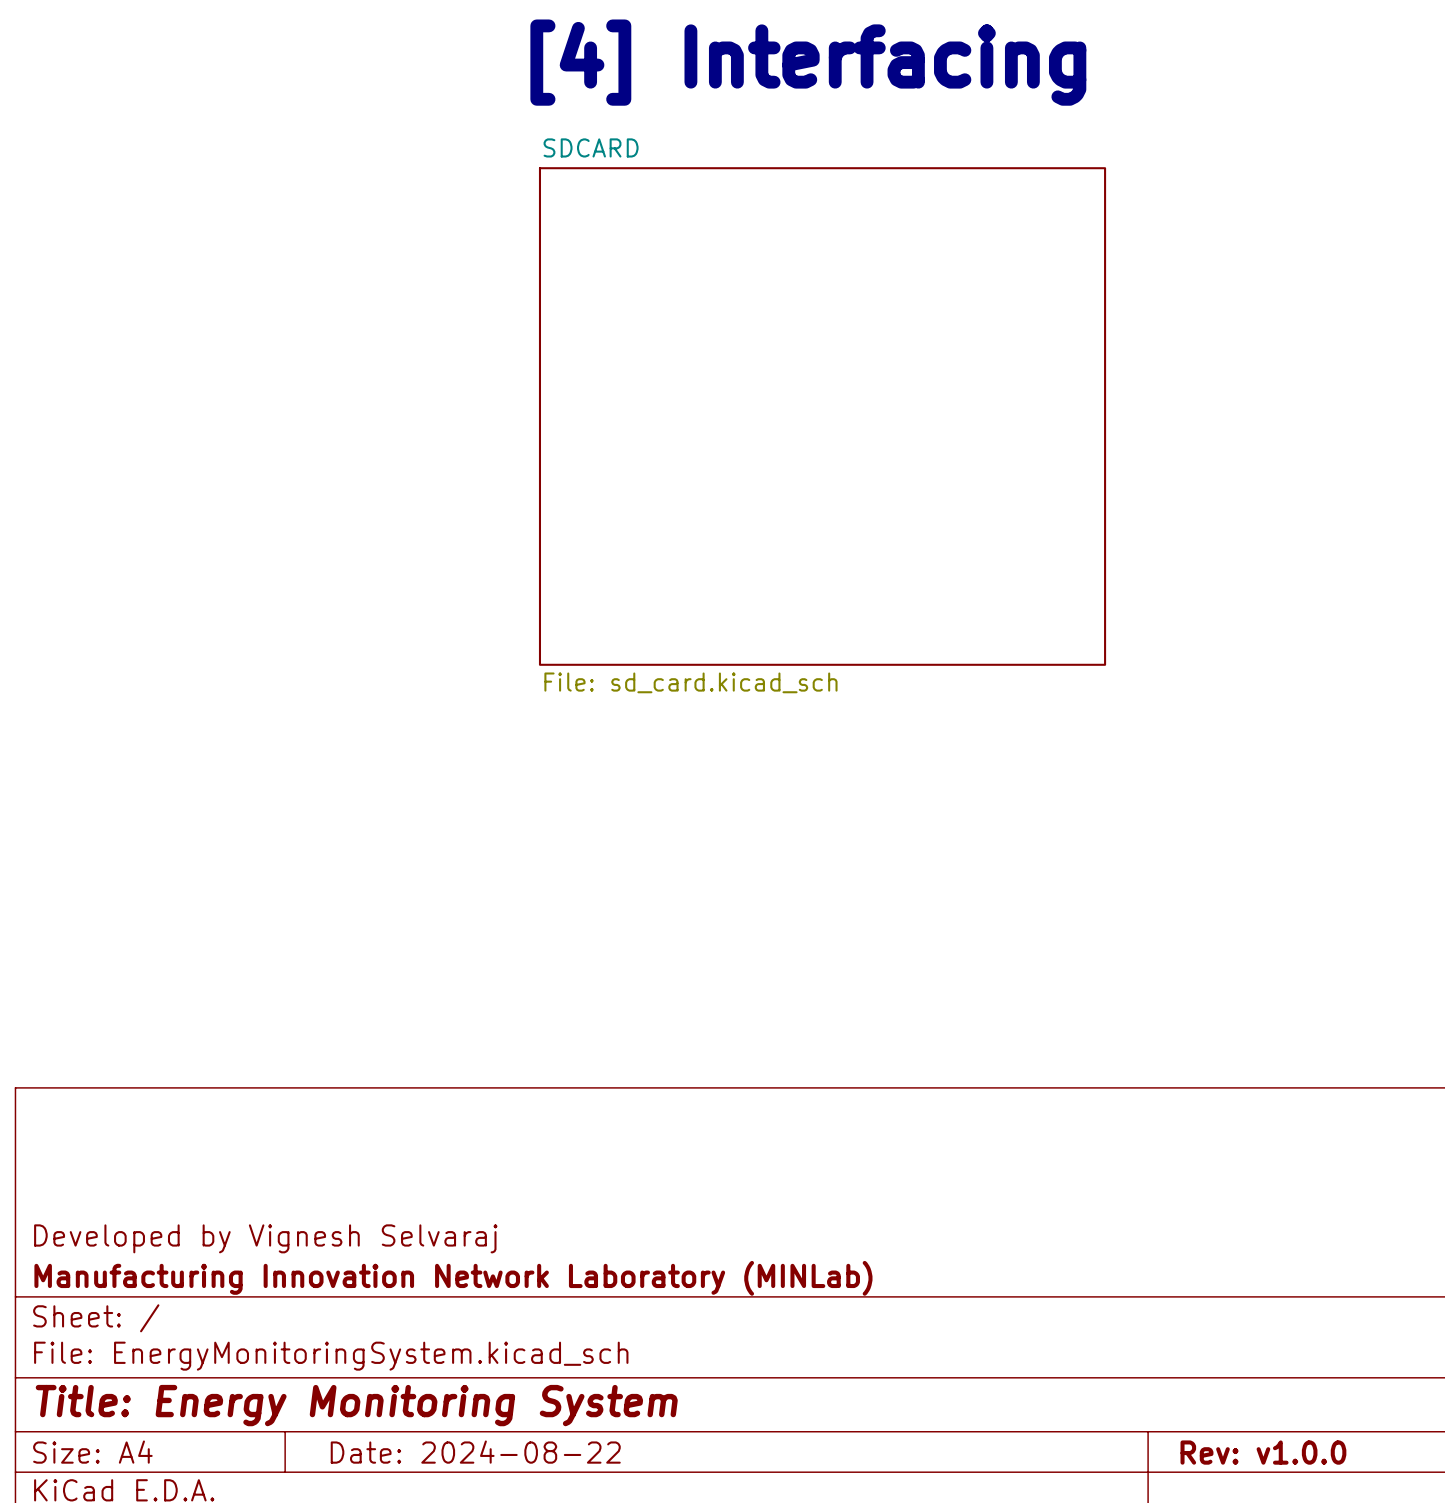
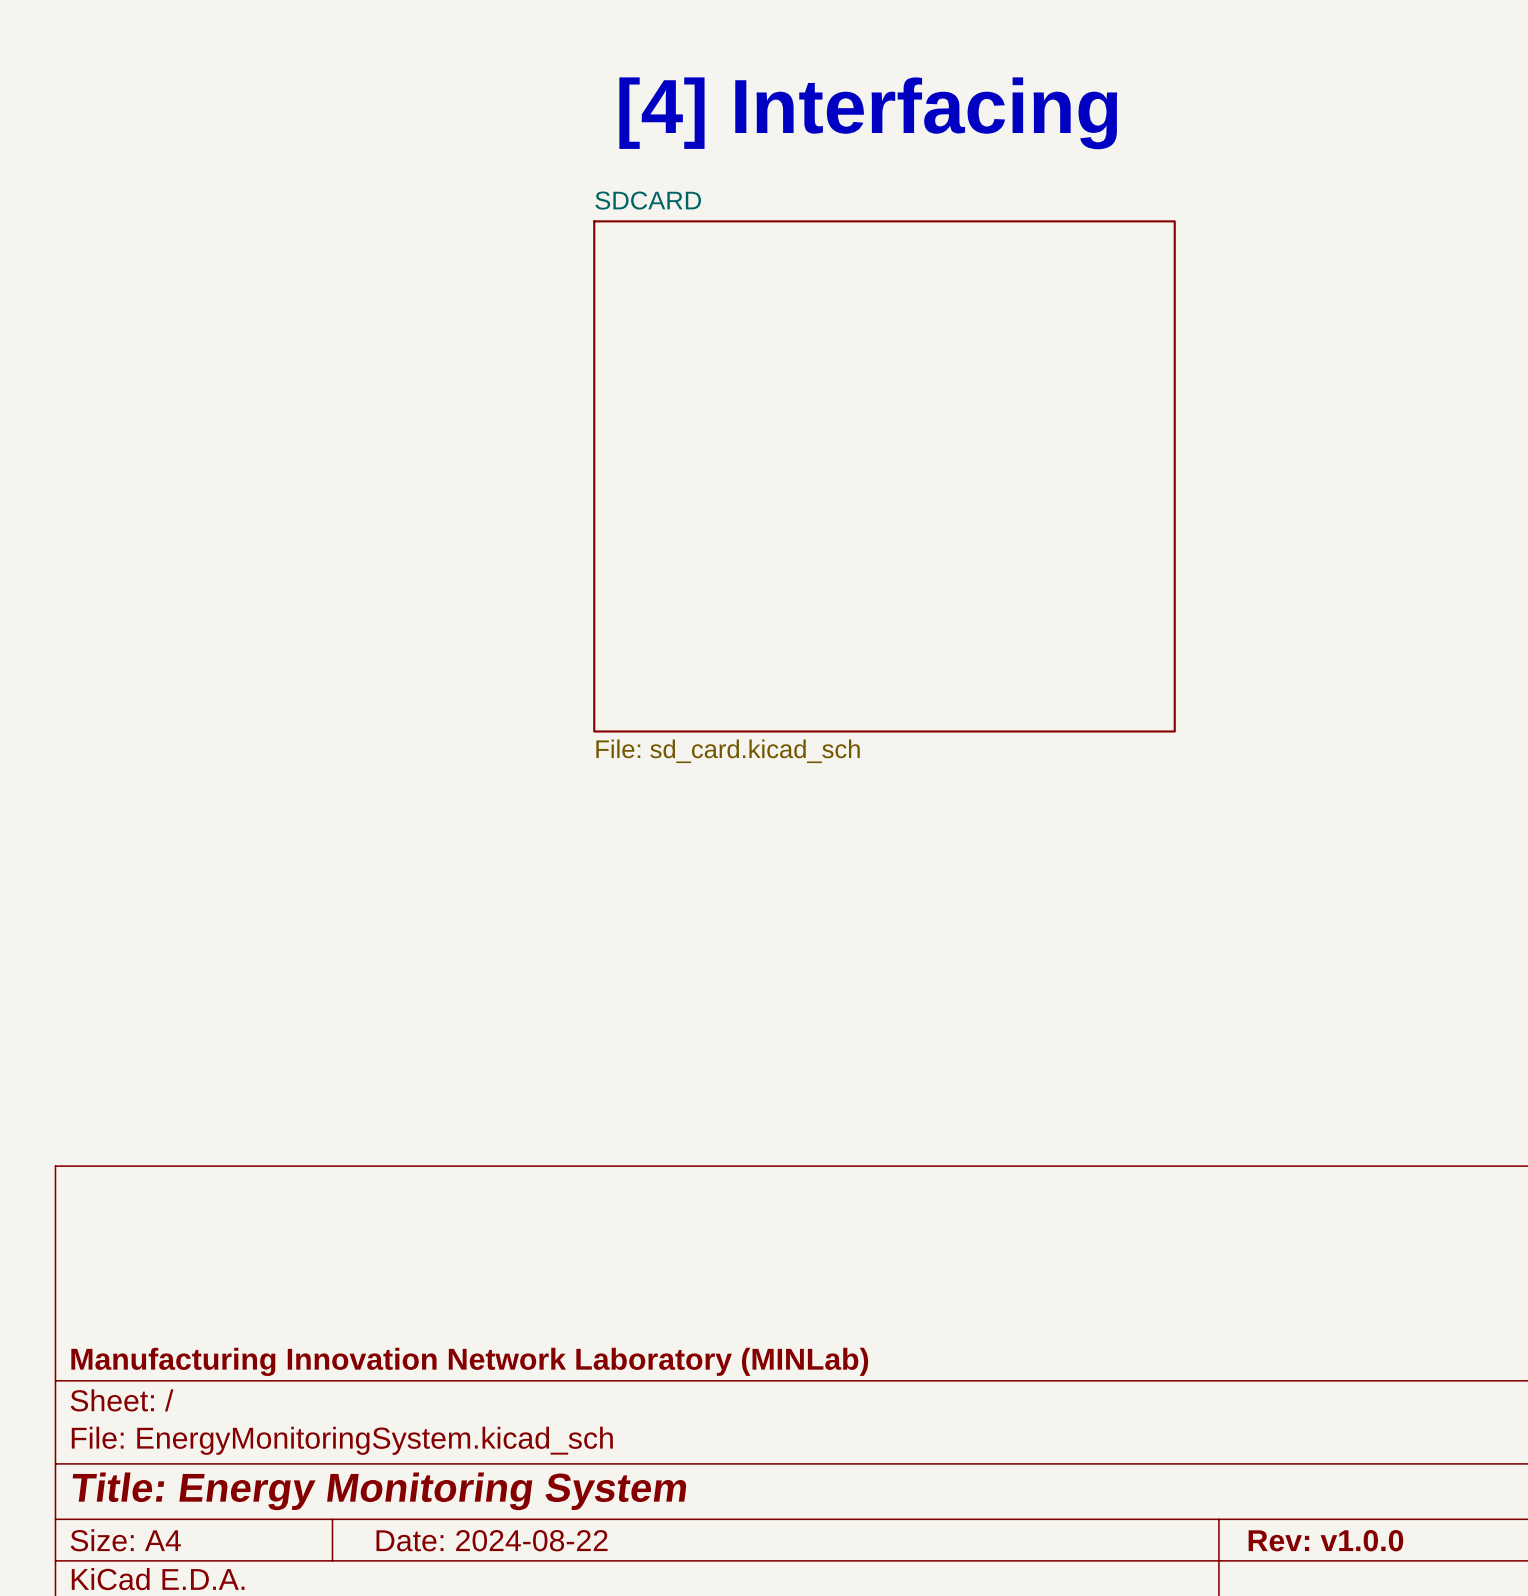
title block: Developed by Vignesh Selvaraj (265, 1238) -> none

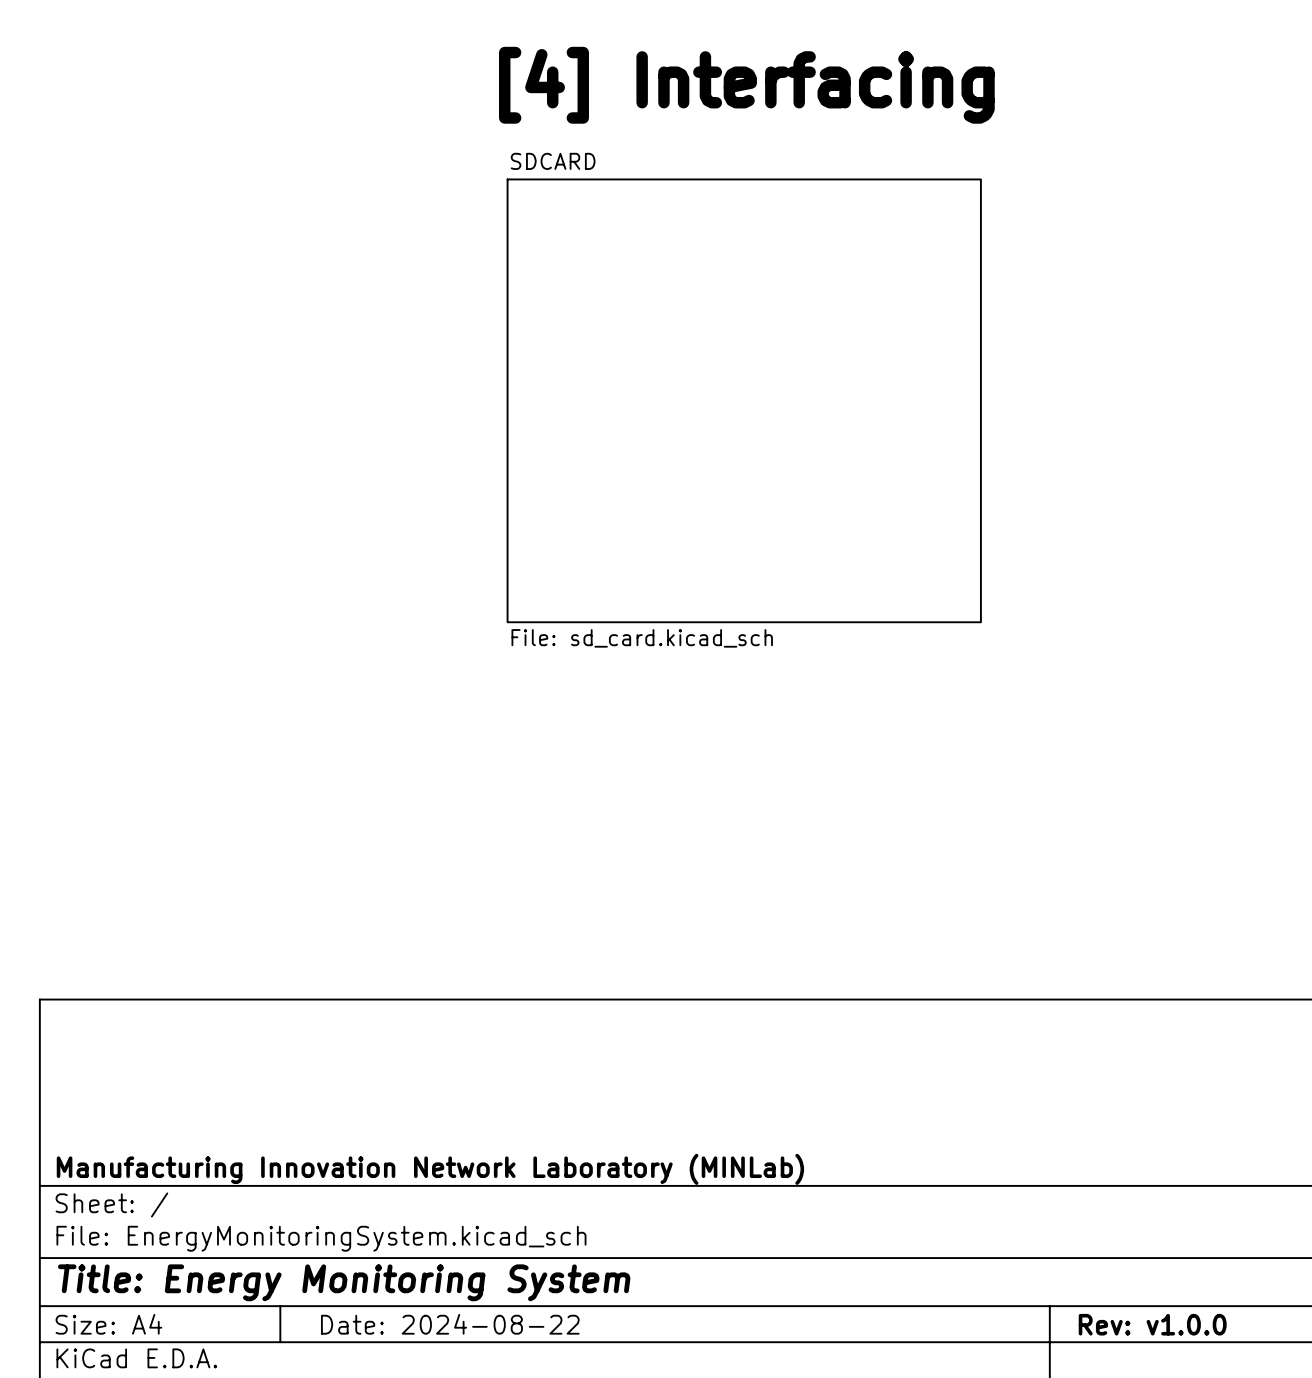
sheet SDCARD: none -> File: sd_card.kicad_sch (744, 400)
sheet SDCARD: File: sd_card.kicad_sch (884, 476) -> none

